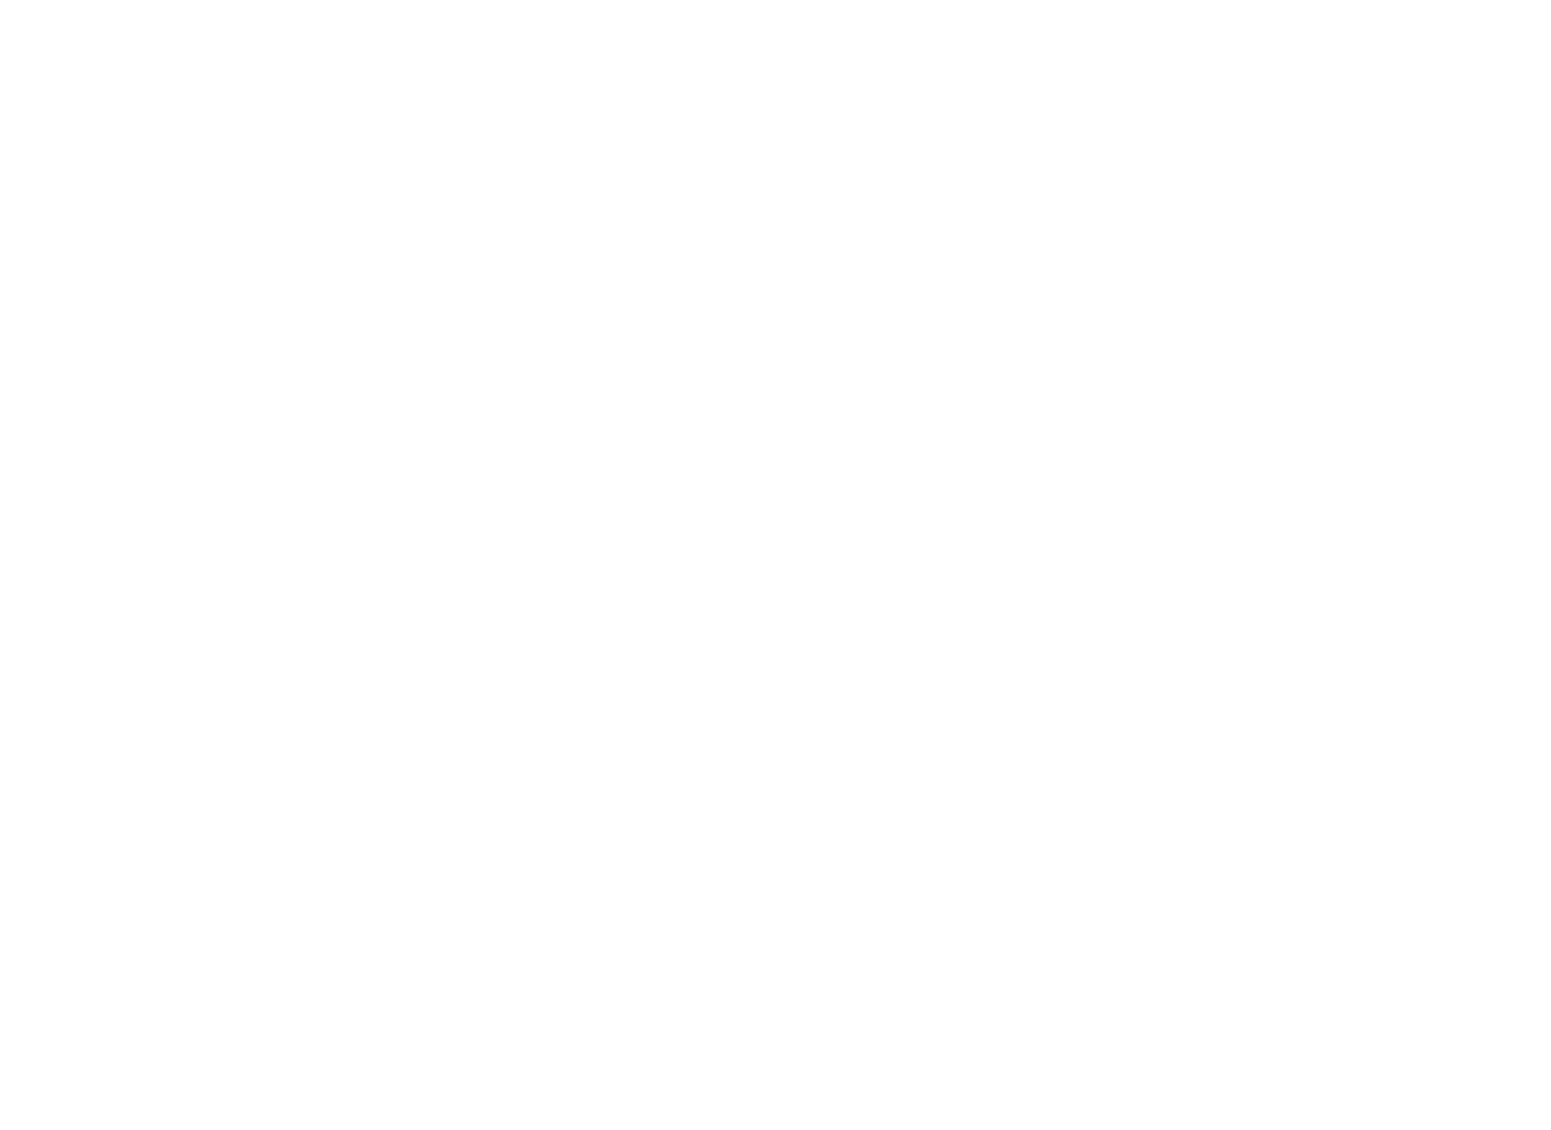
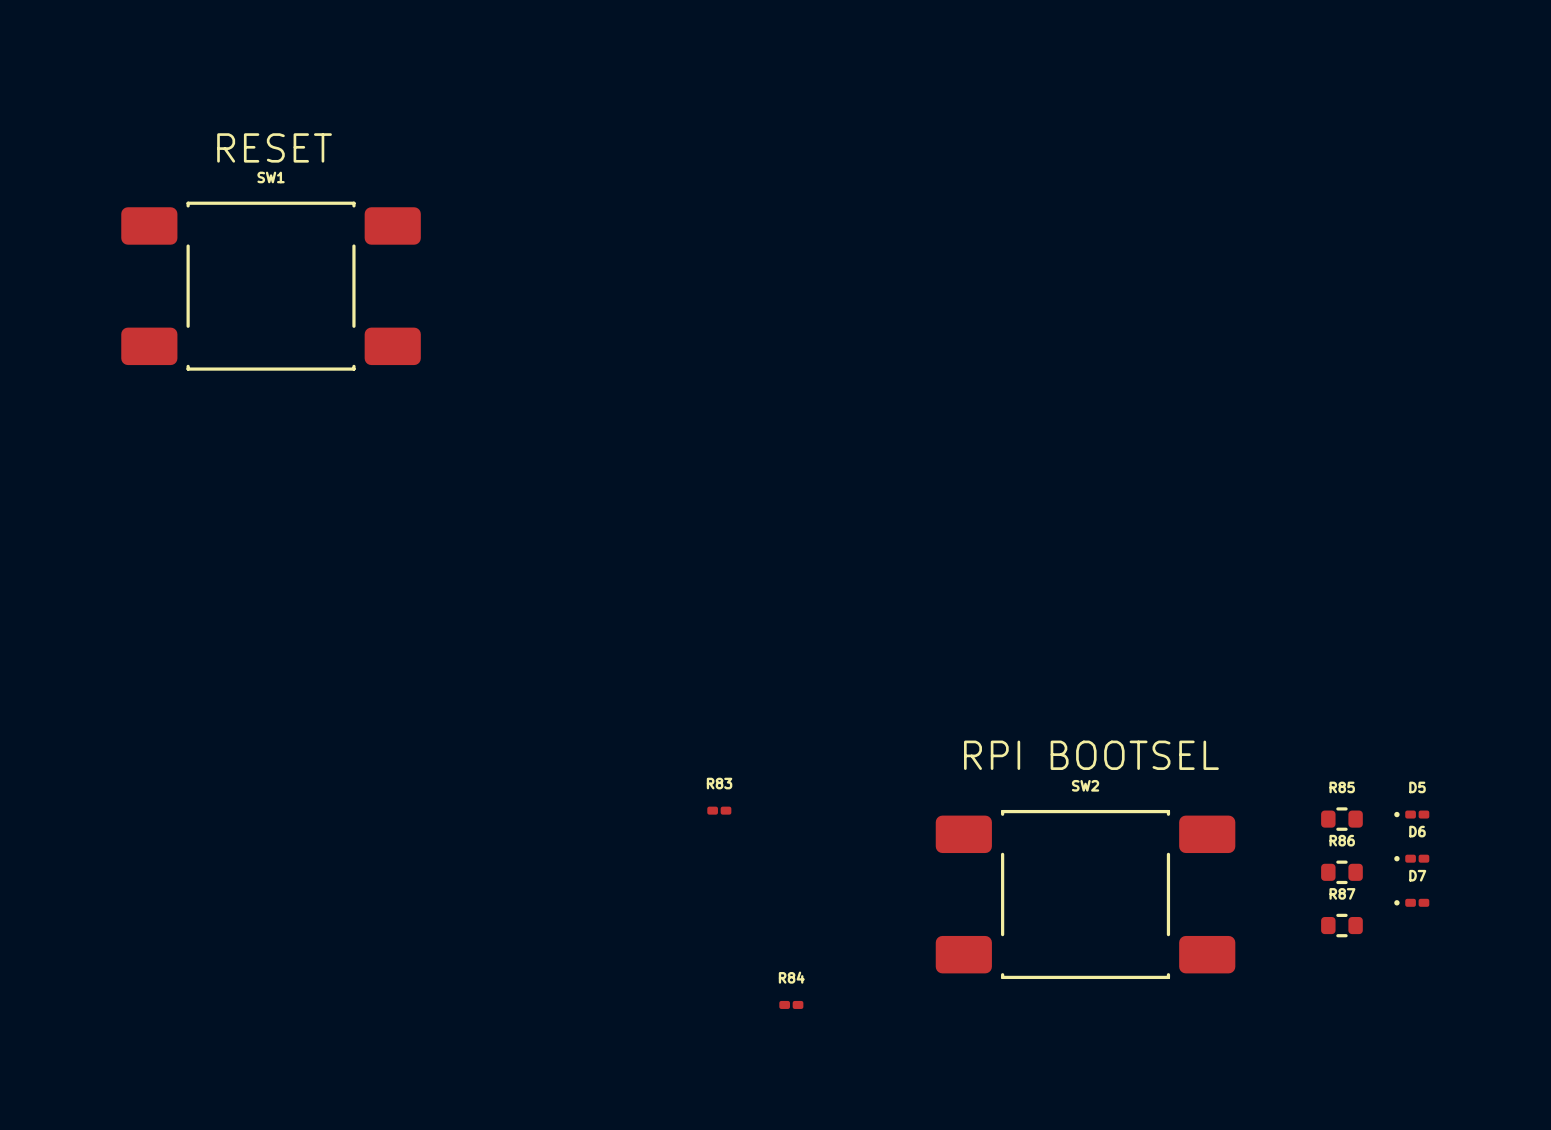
text: none -> RESET (274, 147)
SW1: none -> (271, 286)
text: none -> RPI BOOTSEL (1091, 755)
R83: none -> (719, 810)
D5: none -> (1411, 814)
R85: none -> (1341, 819)
D6: none -> (1411, 858)
R86: none -> (1341, 872)
SW2: none -> (1085, 894)
D7: none -> (1411, 902)
R87: none -> (1341, 925)
R84: none -> (791, 1004)

